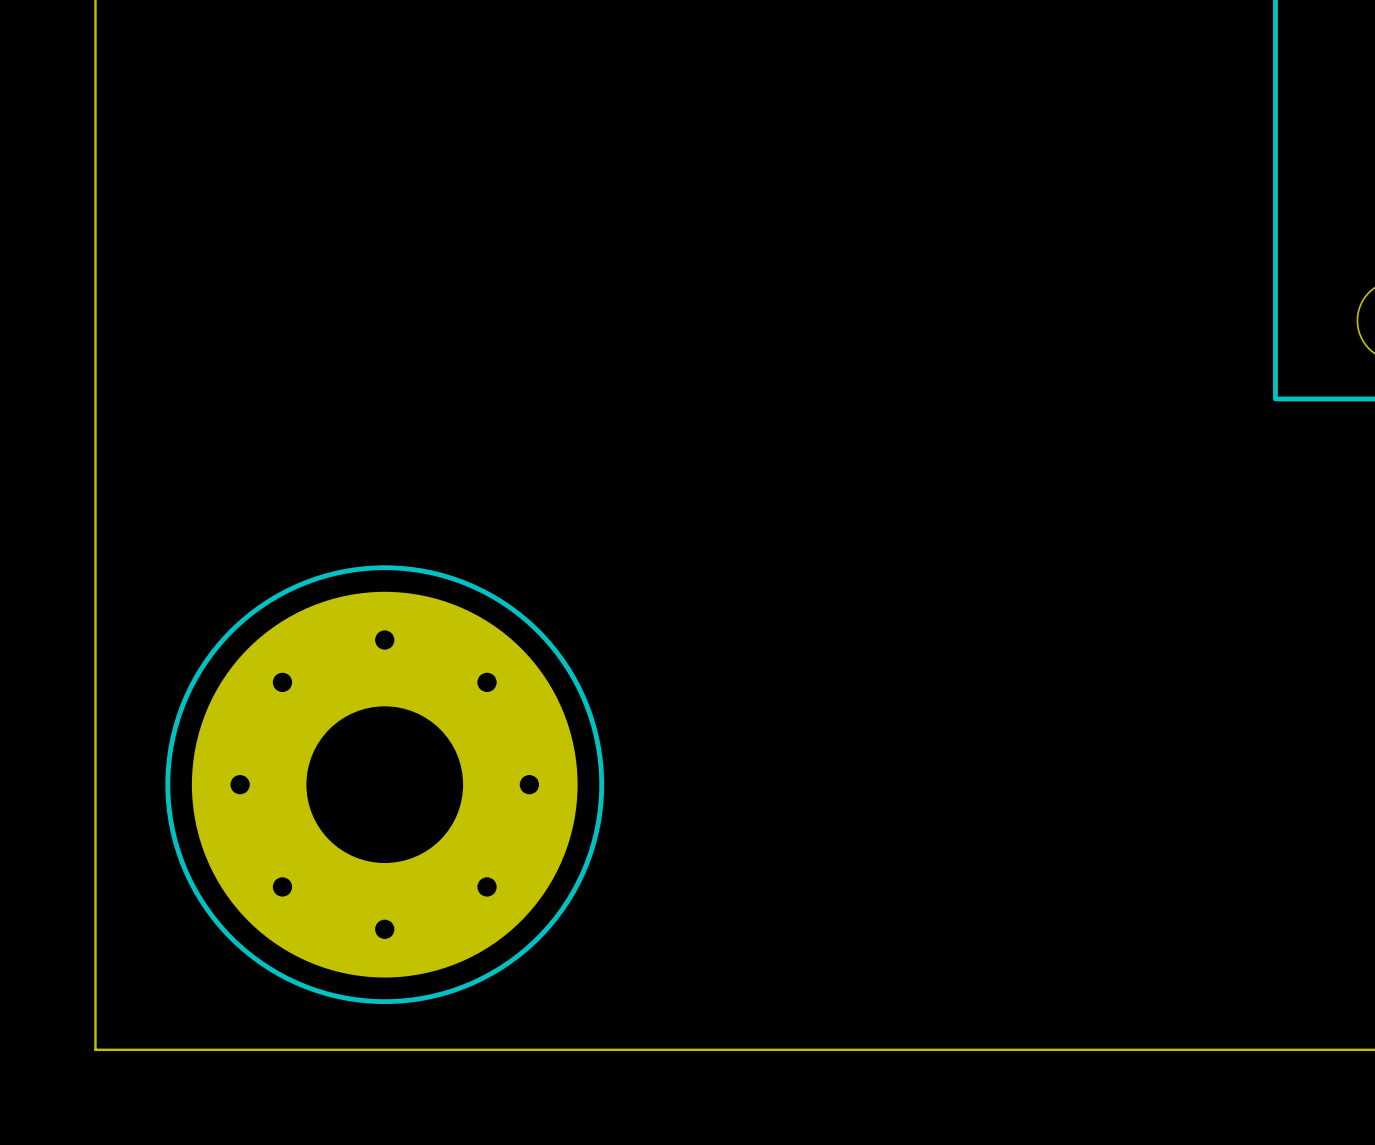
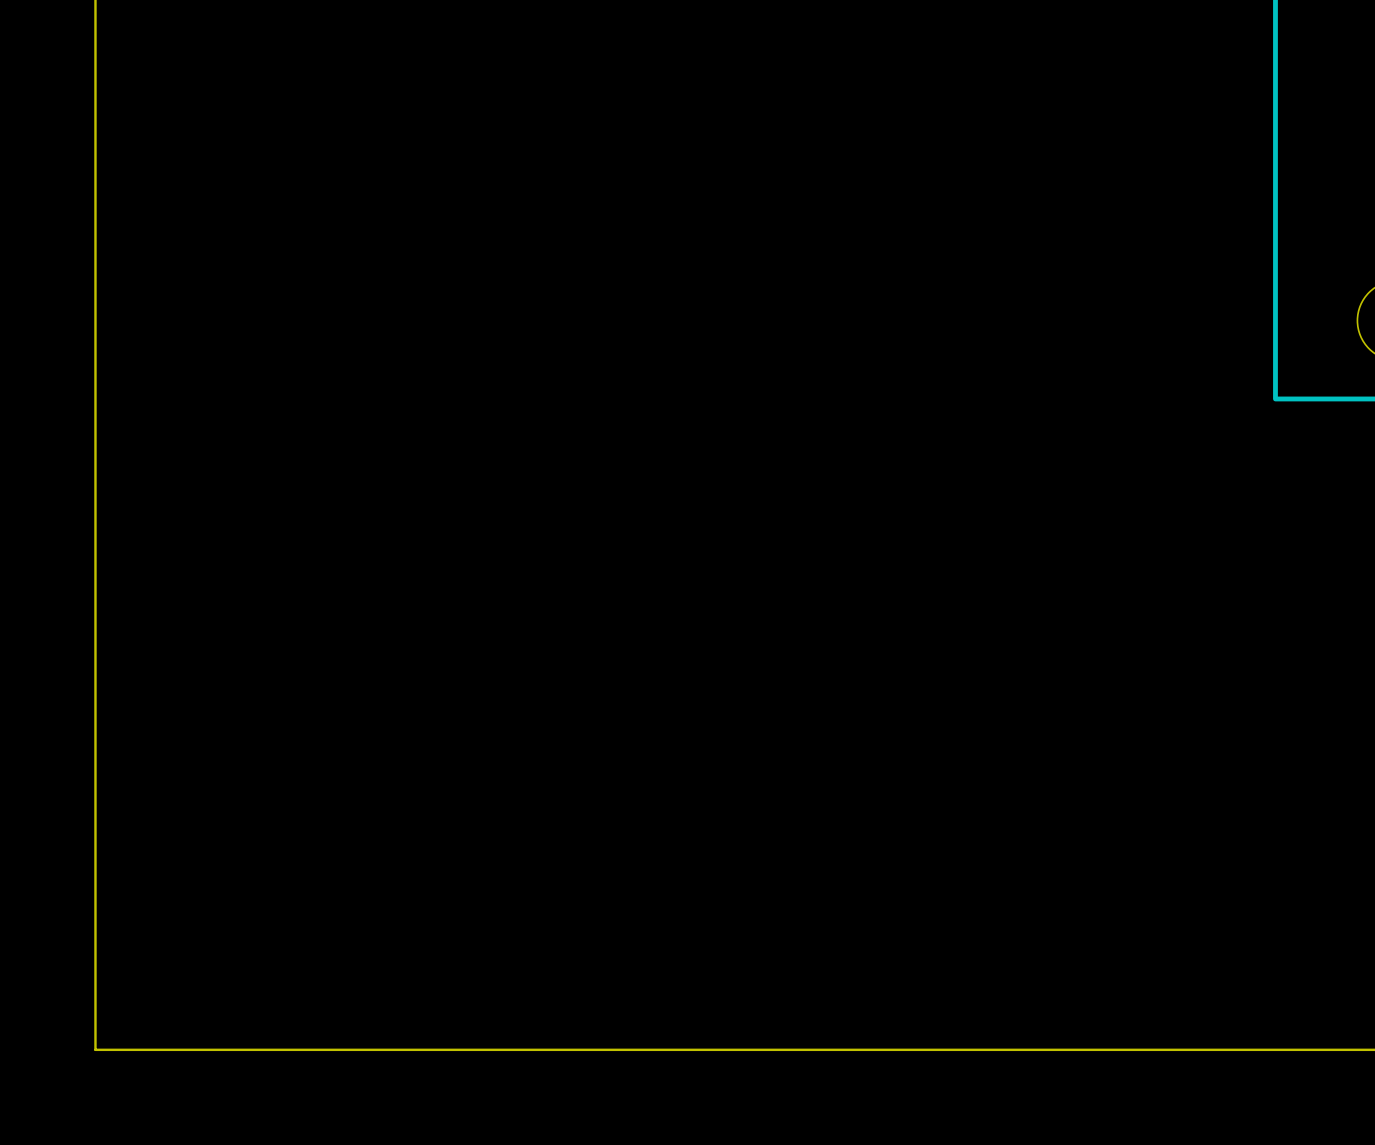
part: (384, 784) -> none

